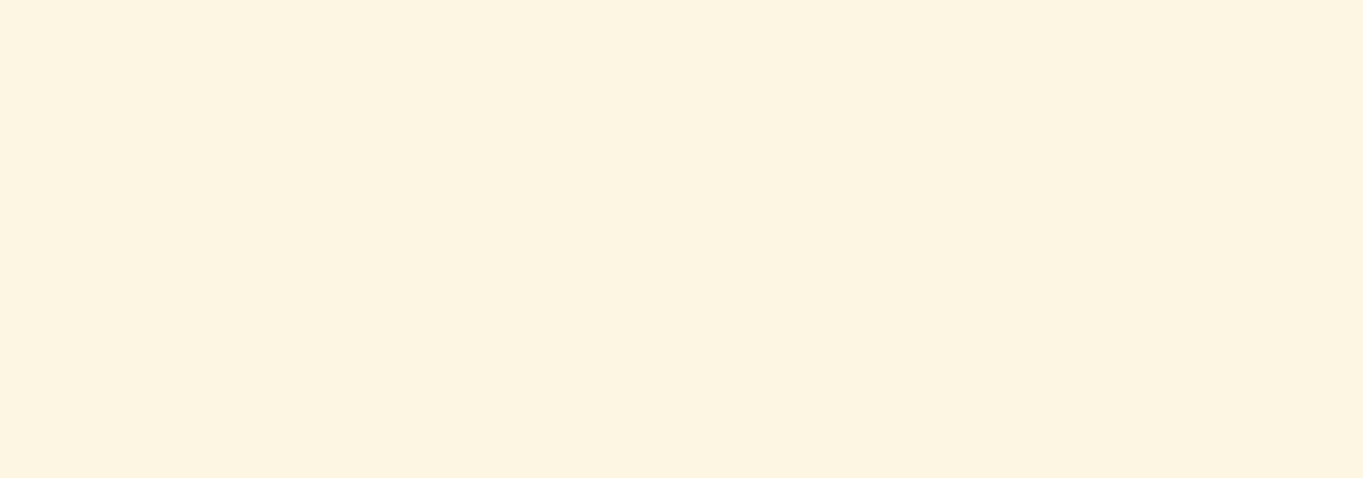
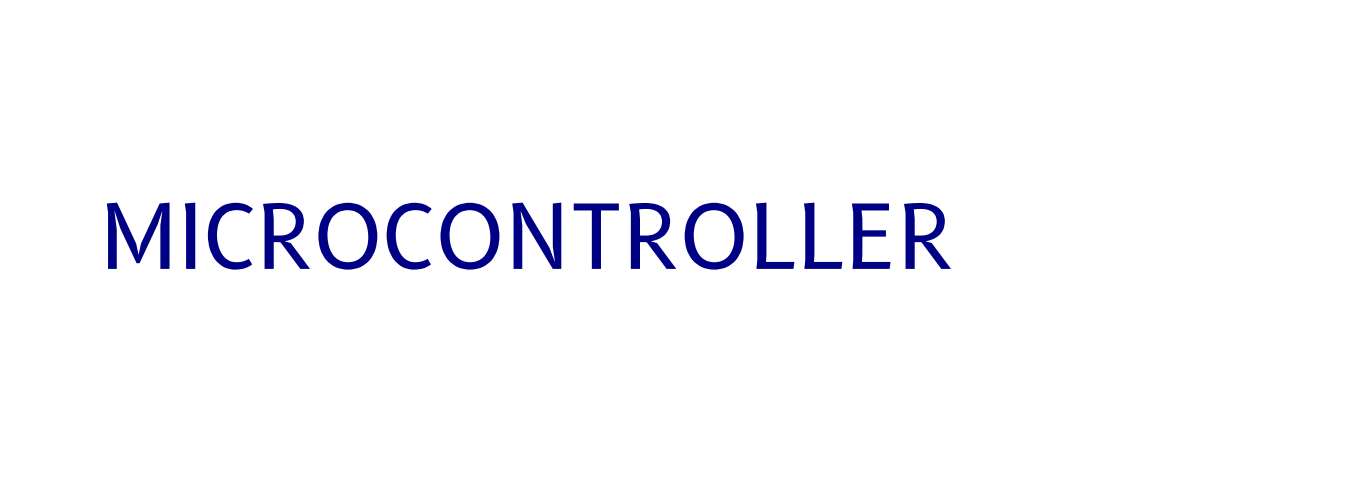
text: none -> MICROCONTROLLER (528, 236)

